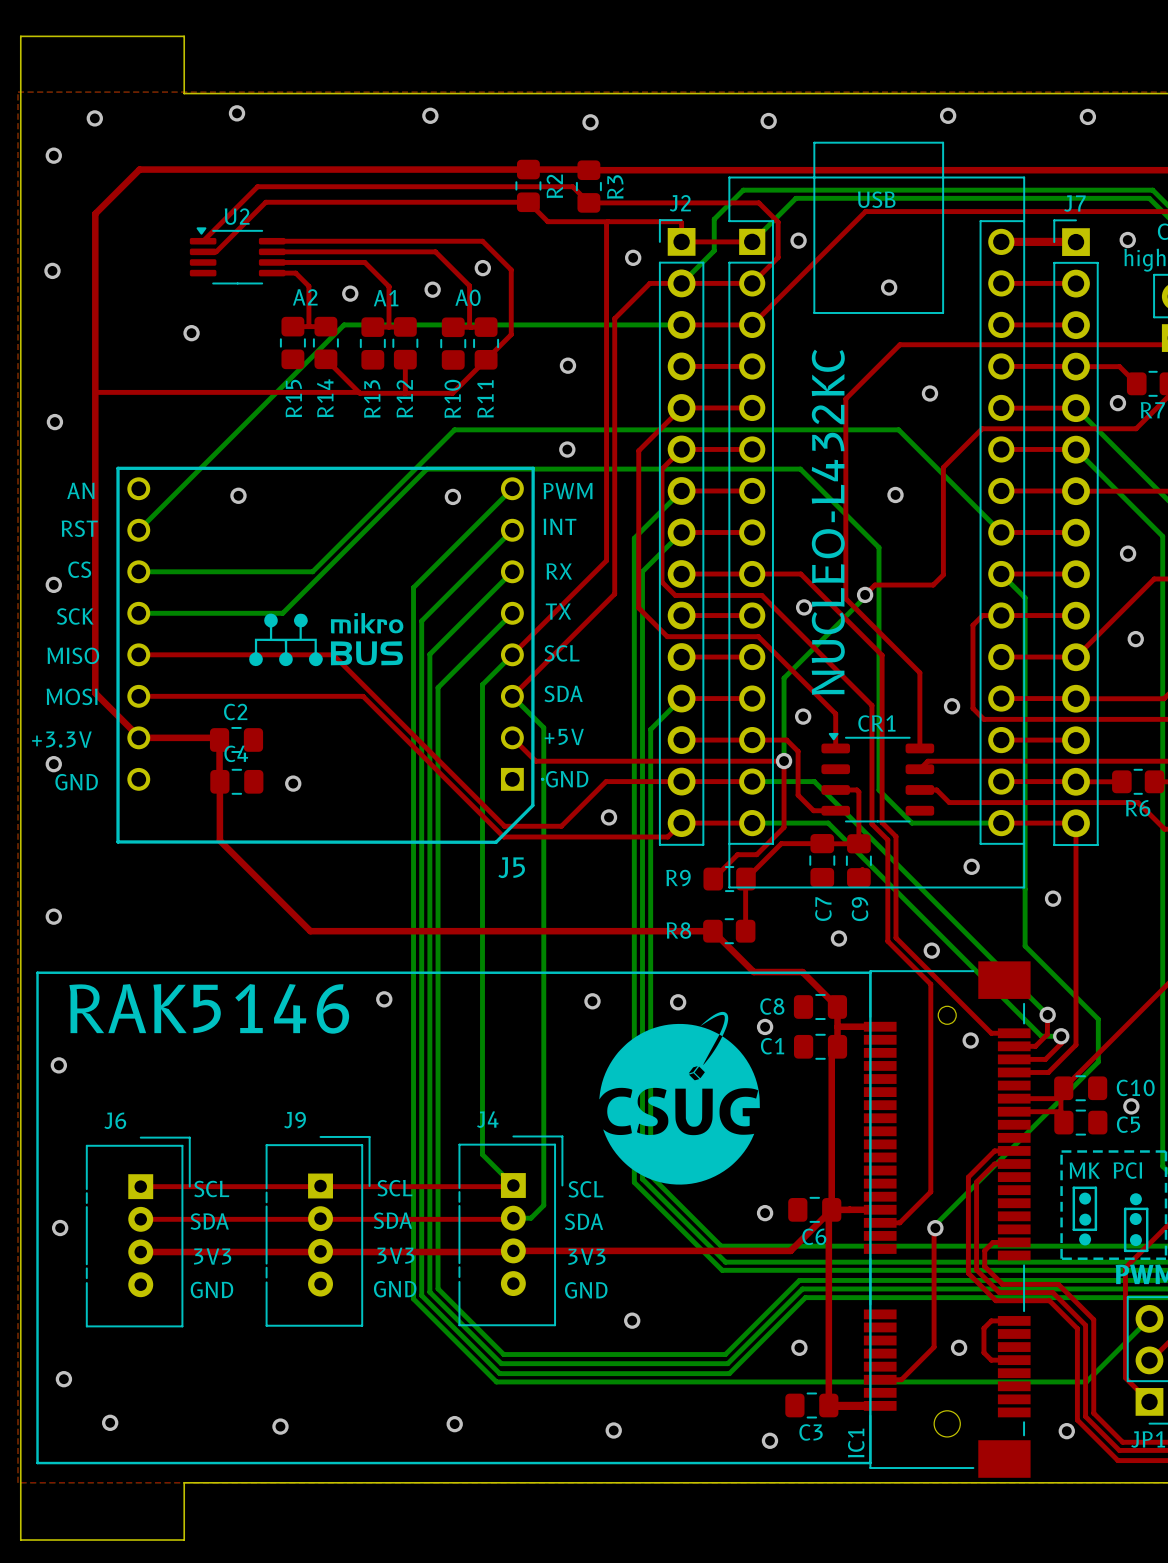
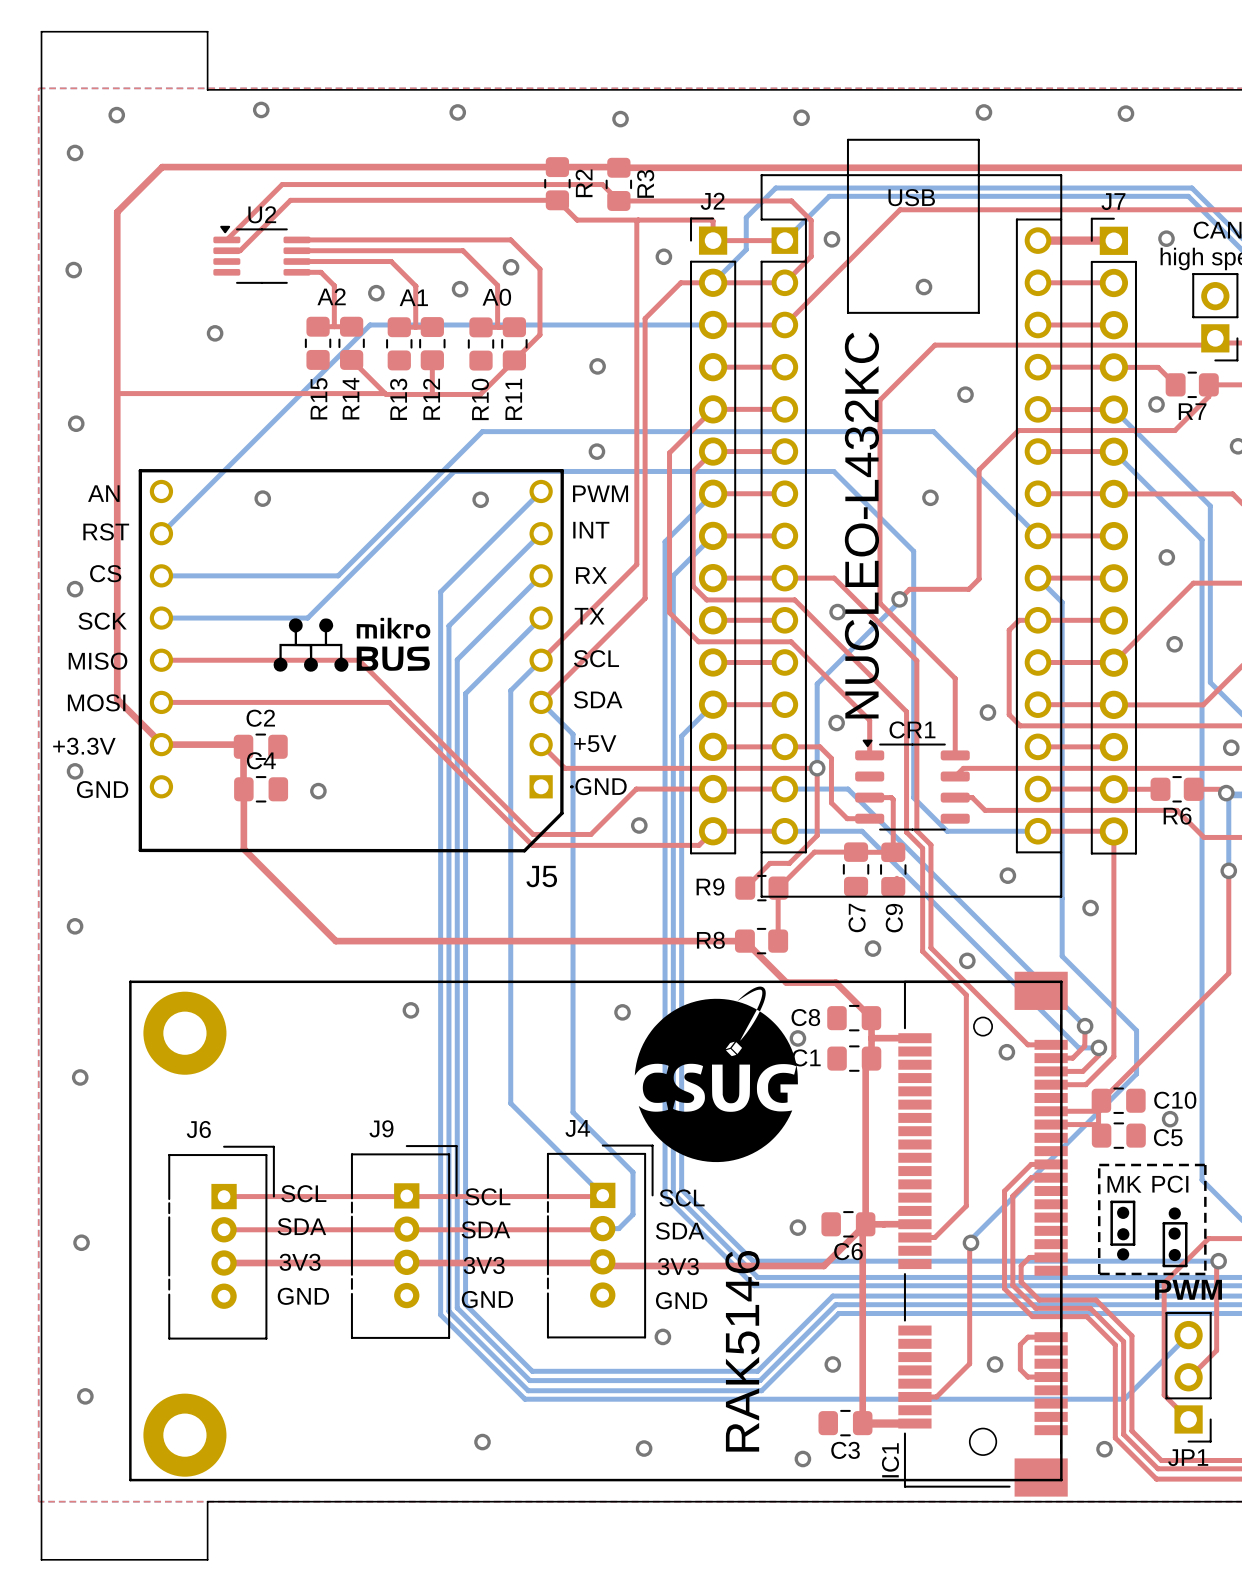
line: (37, 972) (870, 972) (870, 1463) (37, 1463) (37, 972) -> (130, 981) (130, 1480) (1061, 1480) (1061, 981) (130, 981)
text: RAK5146 (209, 1008) -> none
part: none -> (184, 1033)
bottom track: (482, 1090) (482, 1154) (513, 1185) -> (510, 1103) (602, 1195)
drawing position: (679, 1098) -> (716, 1074)
bottom track: (543, 1099) (543, 1205) (530, 1218) (513, 1218) -> (573, 1112) (632, 1172) (632, 1214) (618, 1228) (602, 1228)
text: none -> SCL (303, 1193)
top track: (513, 1185) (140, 1186) -> (602, 1195) (224, 1196)
text: SCL (211, 1188) -> none
text position: SCL (394, 1188) -> SCL (487, 1196)
text position: SCL (586, 1189) -> SCL (682, 1198)
text: none -> SDA (301, 1226)
top track: (513, 1218) (140, 1219) -> (602, 1228) (224, 1229)
text position: SDA (392, 1220) -> SDA (485, 1229)
text: SDA (209, 1221) -> none
text position: SDA (584, 1221) -> SDA (680, 1231)
J4 position: (510, 1230) -> (600, 1241)
J9 position: (318, 1231) -> (404, 1241)
J6 position: (138, 1232) -> (221, 1242)
text: none -> 3V3 (300, 1262)
top track: (577, 1250) (140, 1252) -> (606, 1265) (602, 1261) (224, 1263)
text position: 3V3 (395, 1255) -> 3V3 (484, 1265)
text: 3V3 (212, 1256) -> none
text position: 3V3 (586, 1256) -> 3V3 (678, 1266)
text: none -> GND (303, 1296)
text: GND (211, 1289) -> none
text position: GND (395, 1289) -> GND (487, 1299)
text position: GND (586, 1290) -> GND (681, 1300)
text: none -> RAK5146 (742, 1351)
part: none -> (184, 1435)
via: (110, 1422) -> none
via: (280, 1426) -> none

